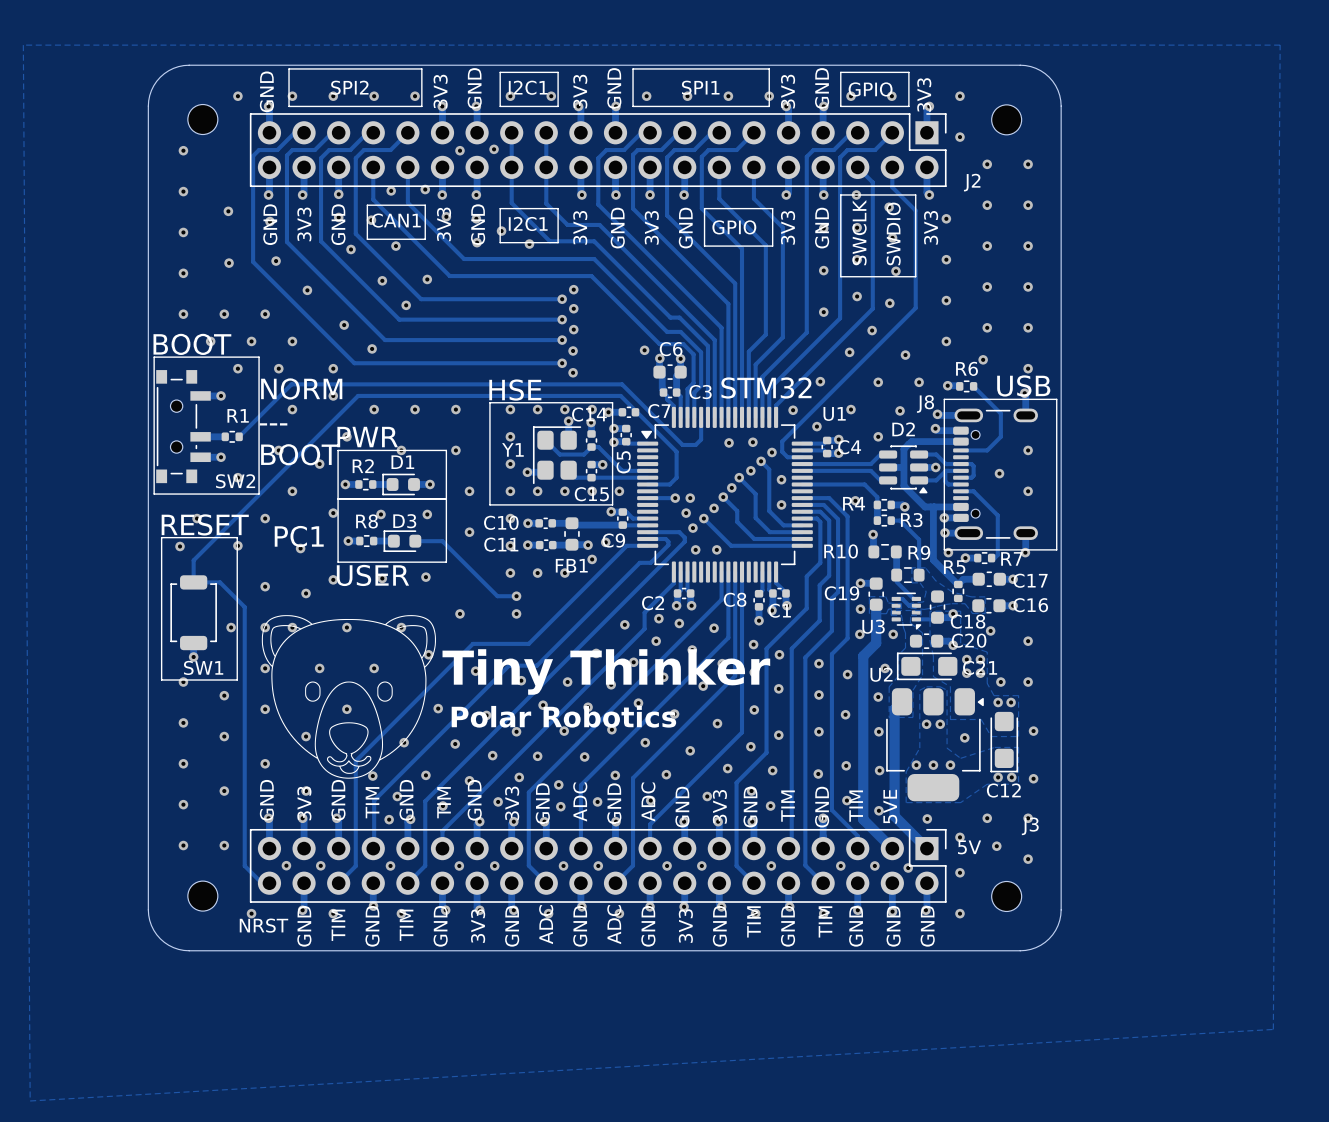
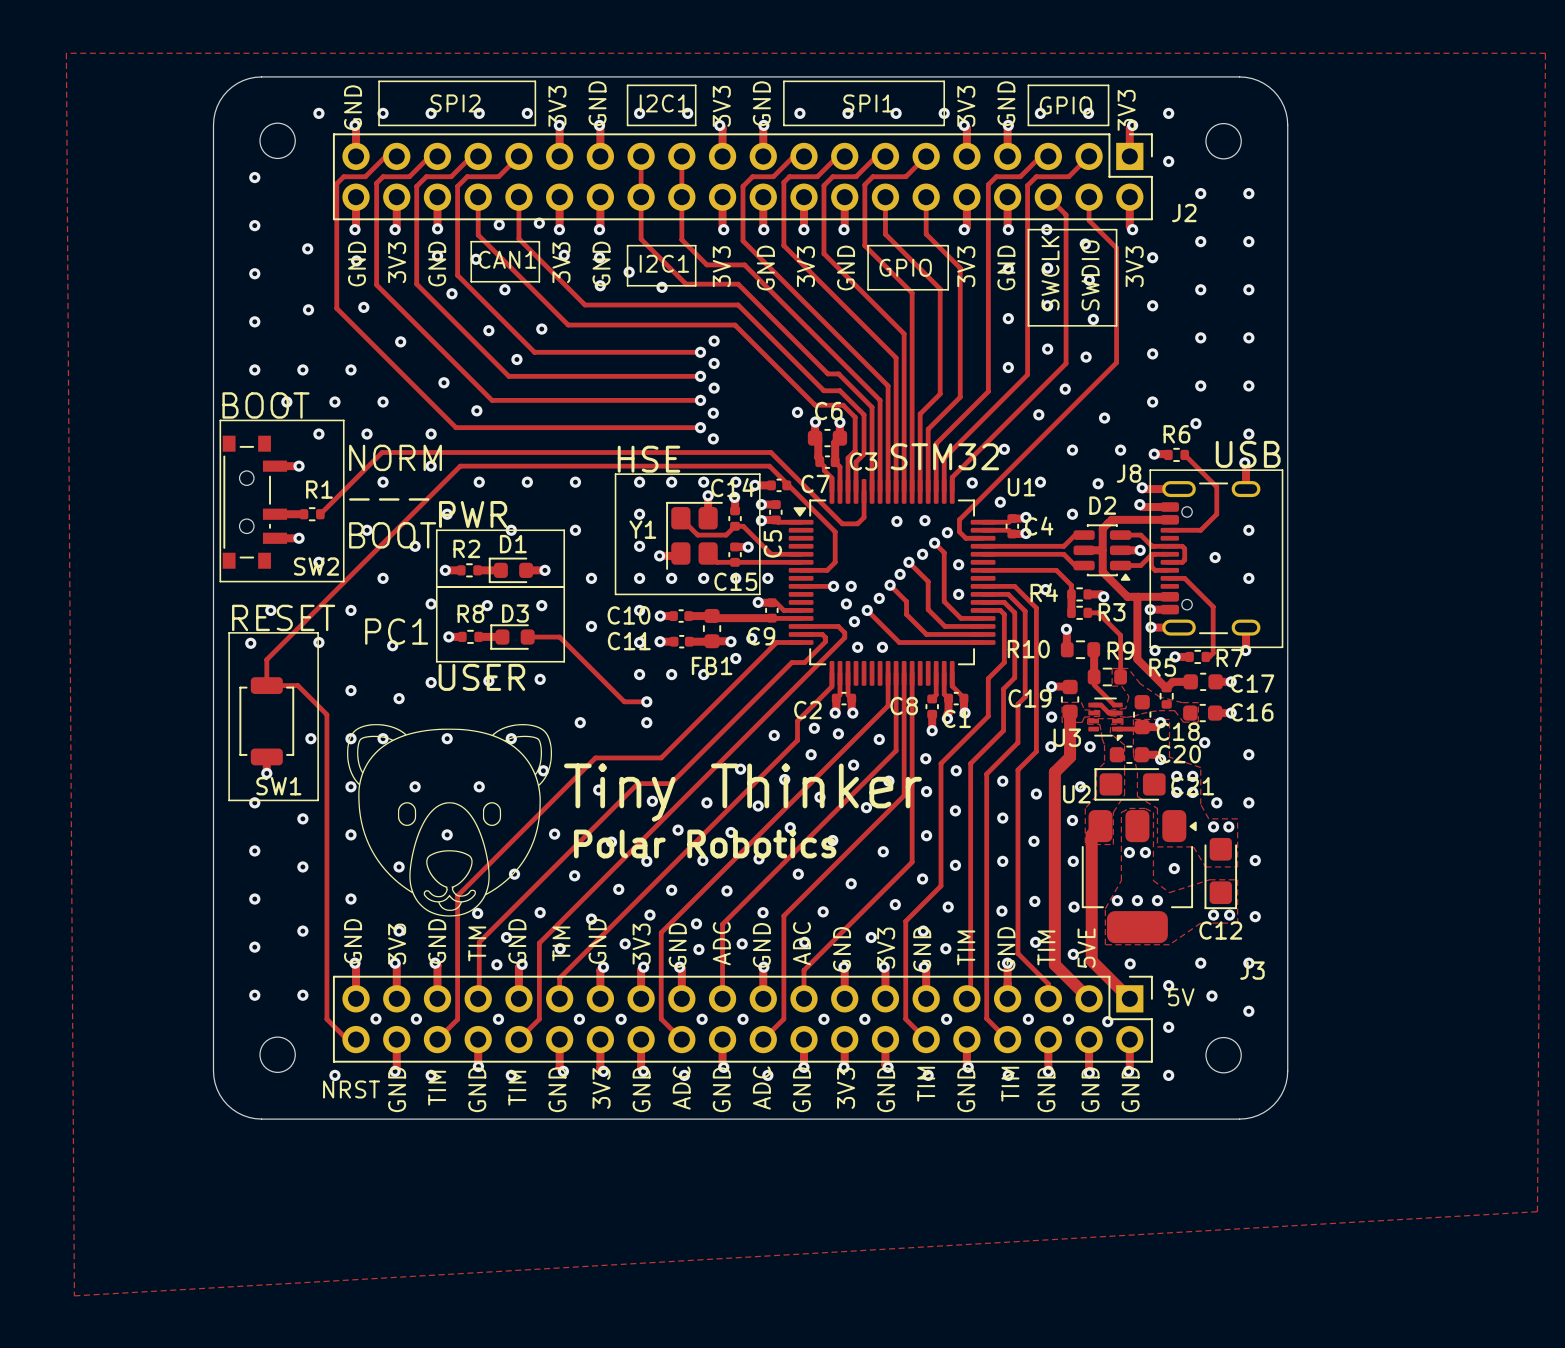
via: (494, 149) -> none
via: (459, 150) -> none

